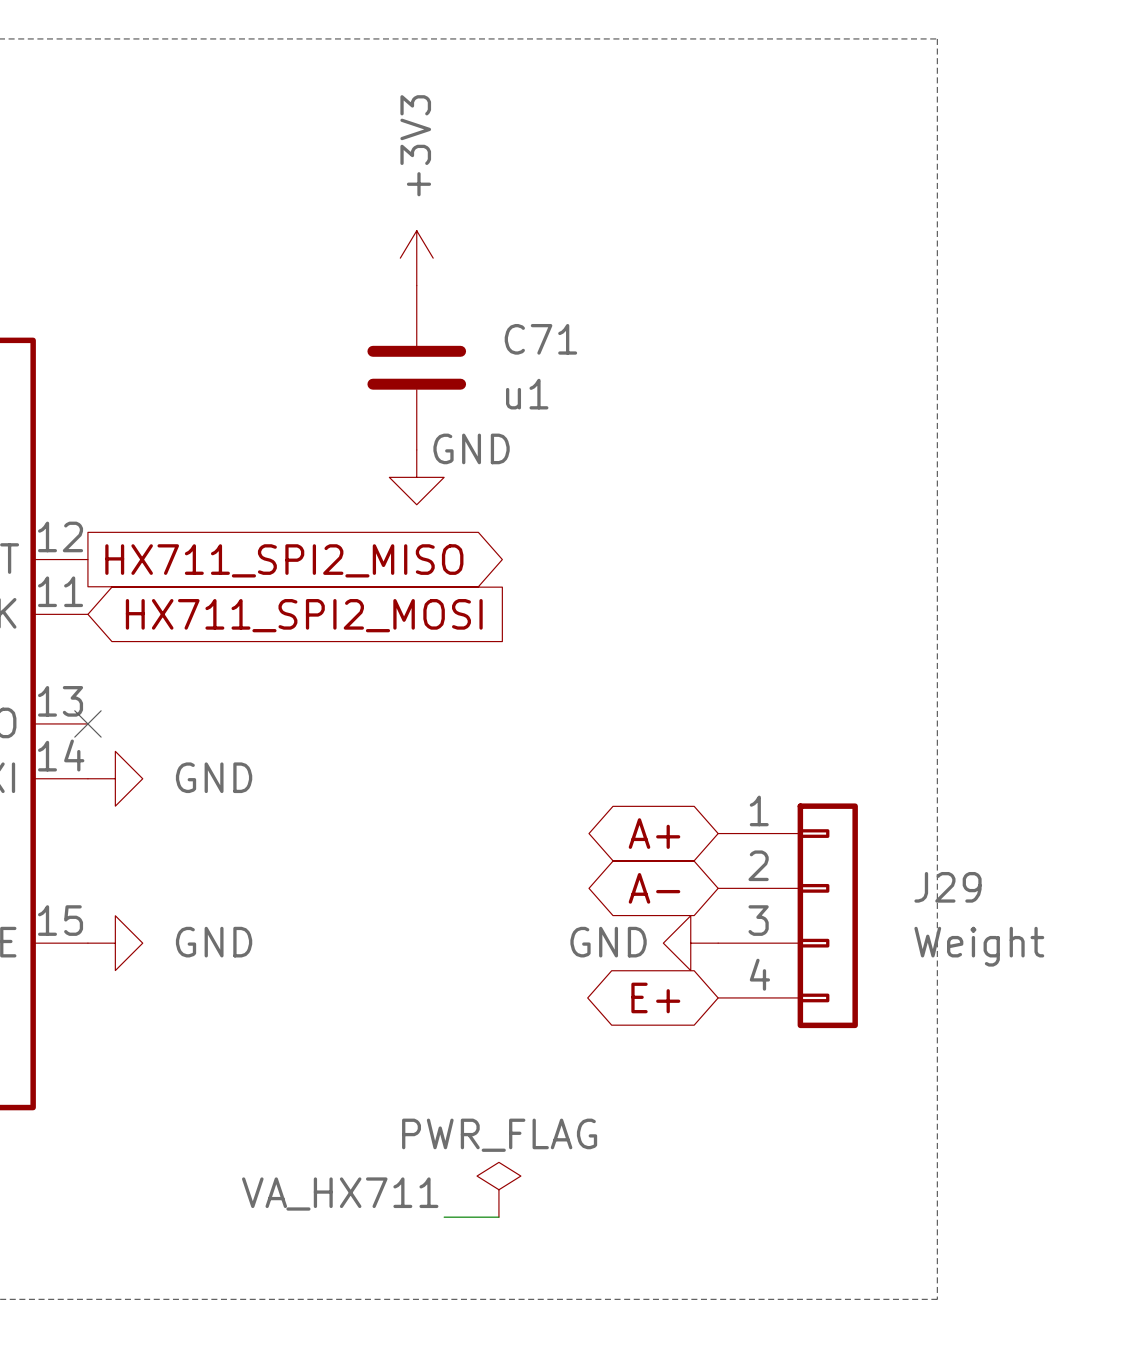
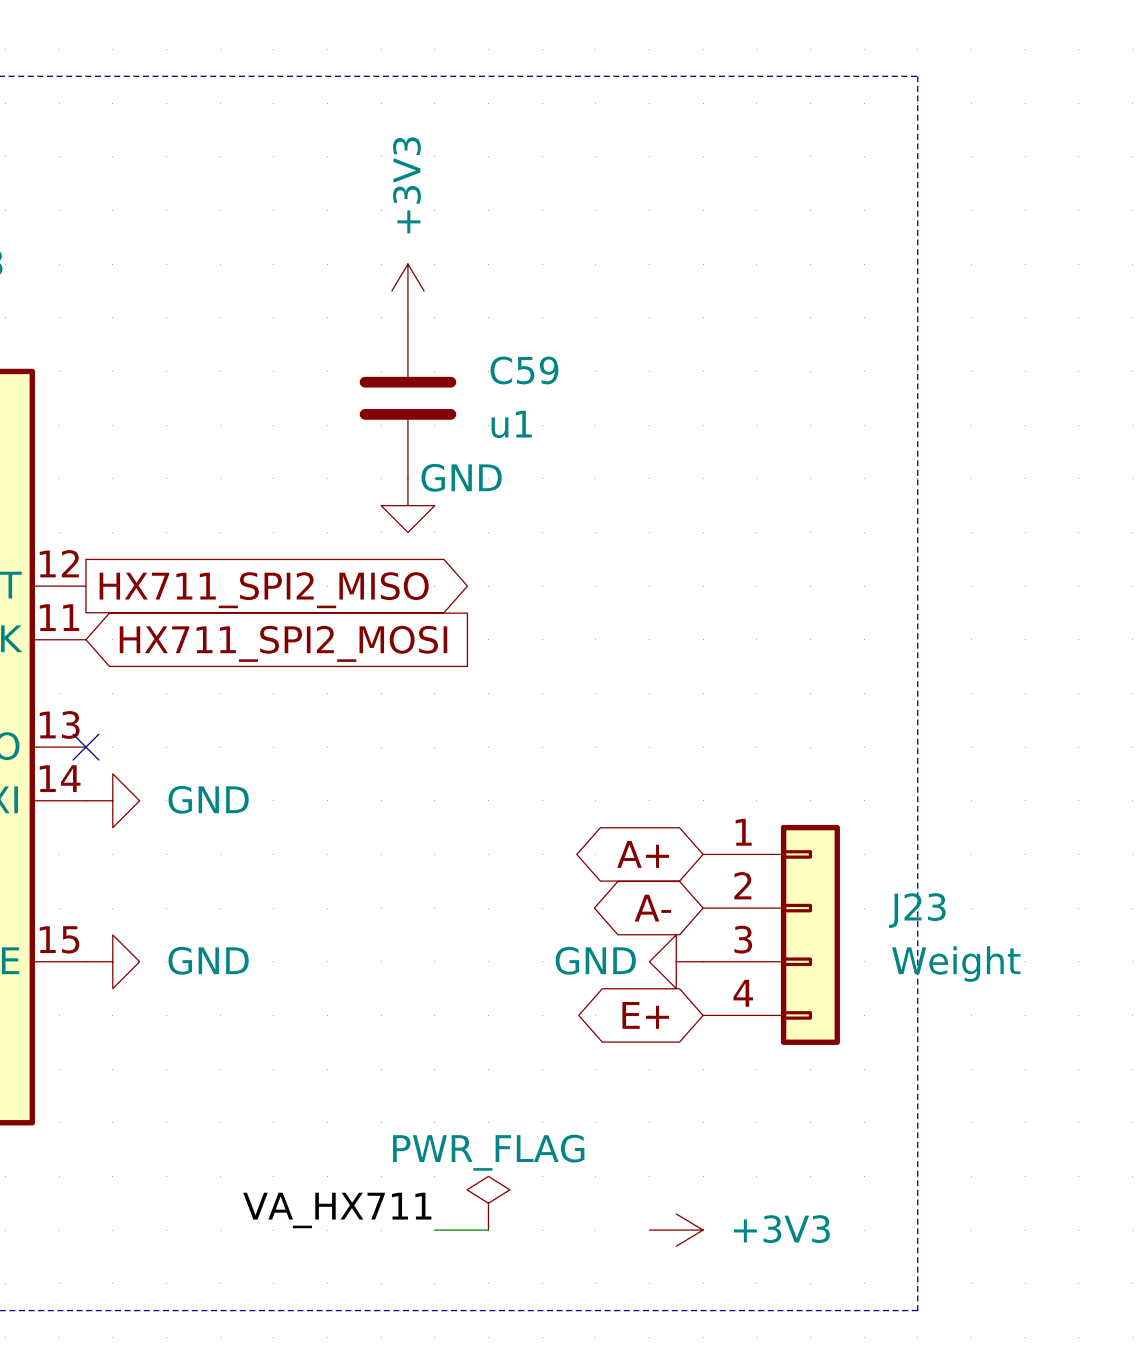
C71 name: C71 (540, 339) -> C59 (524, 370)
J29 name: J29 (948, 887) -> J23 (917, 910)
power symbol: none -> +3V3 (676, 1230)

